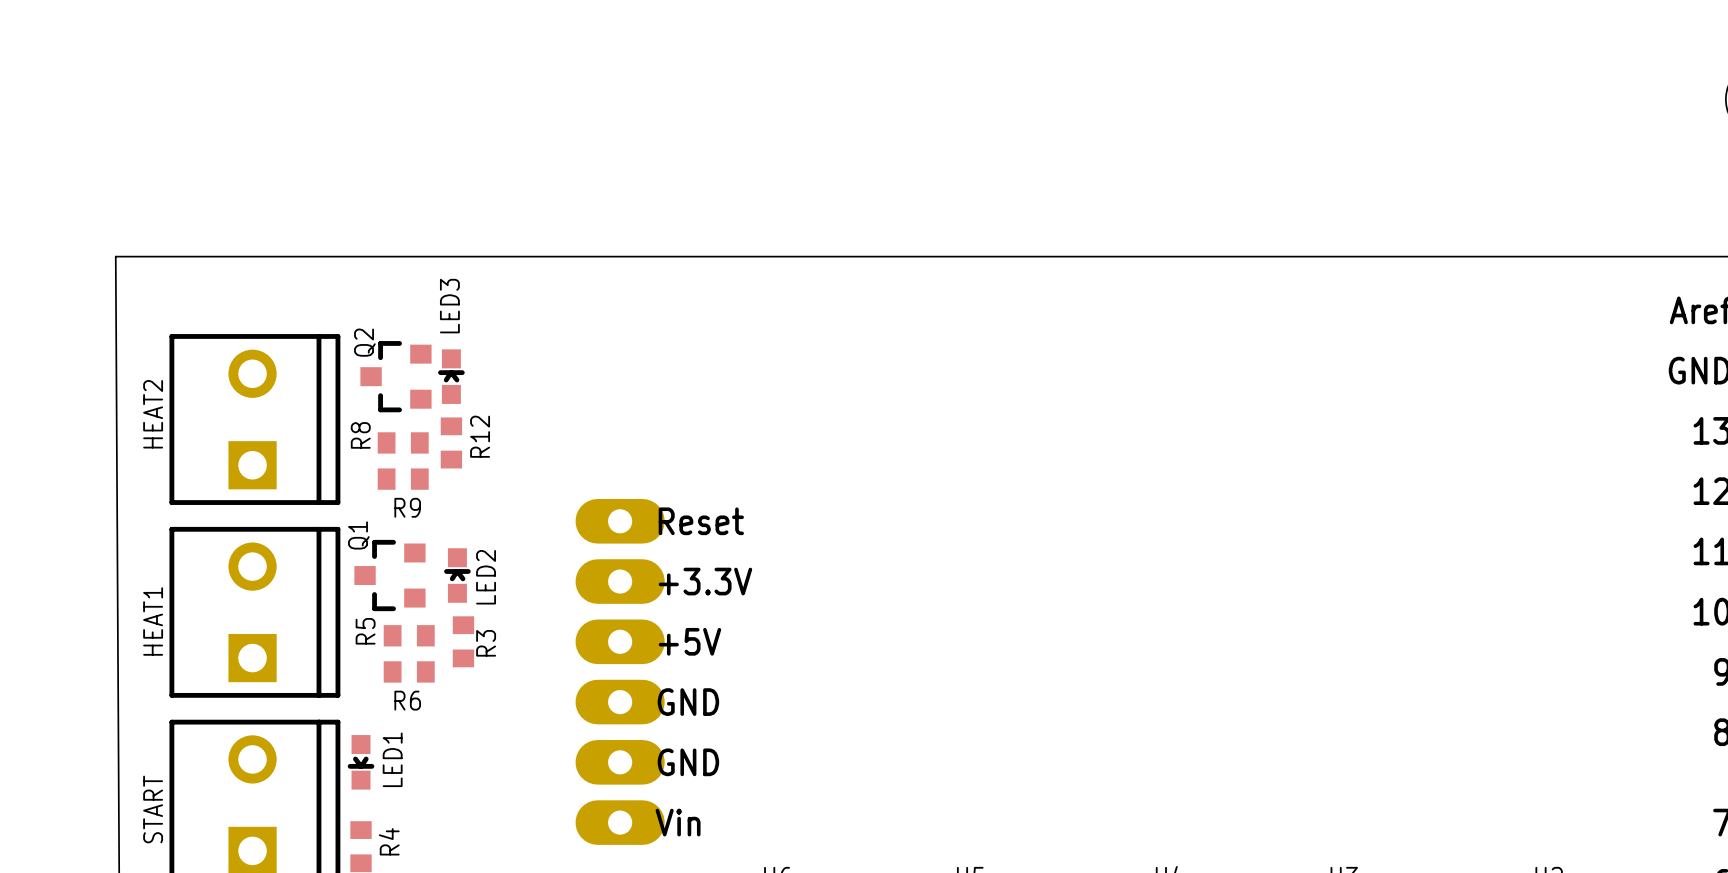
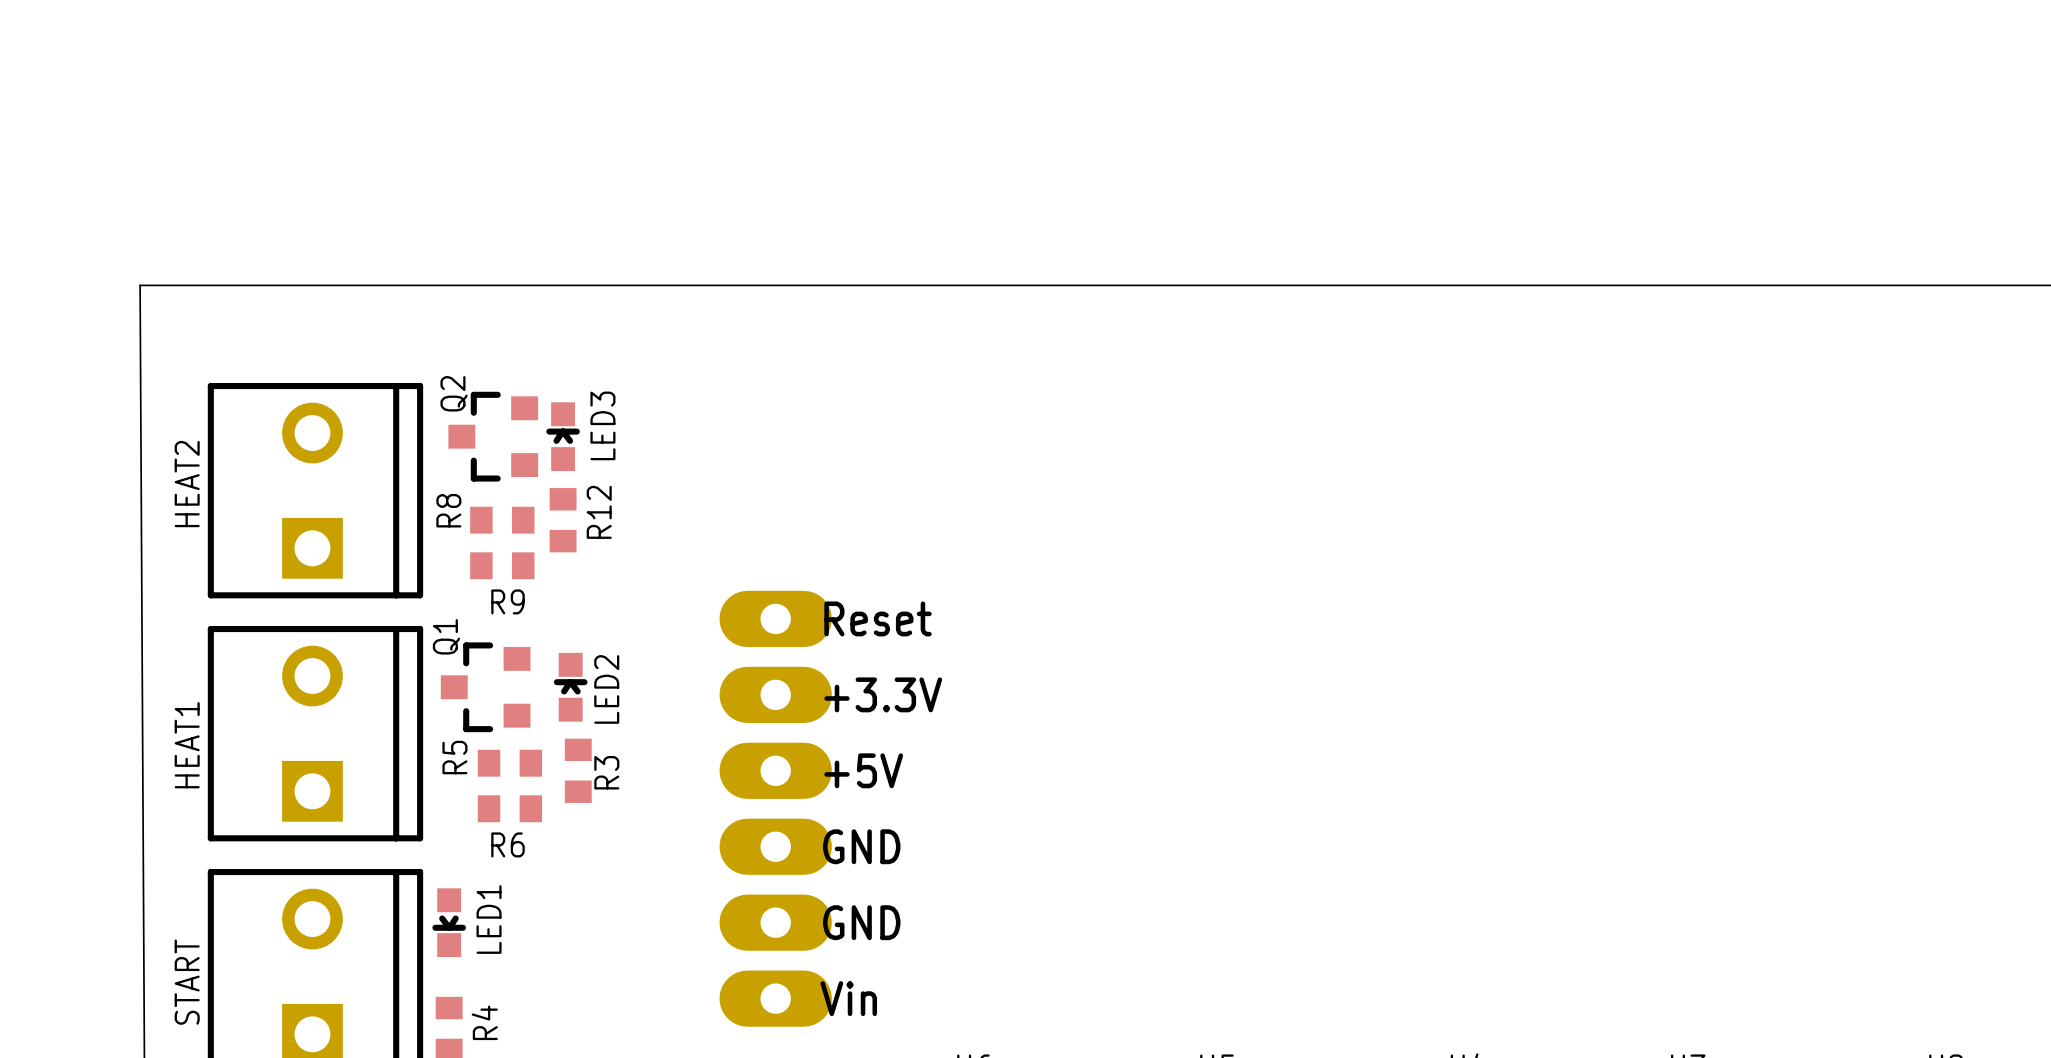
LED3 name position: LED3 (449, 306) -> LED3 (602, 425)

